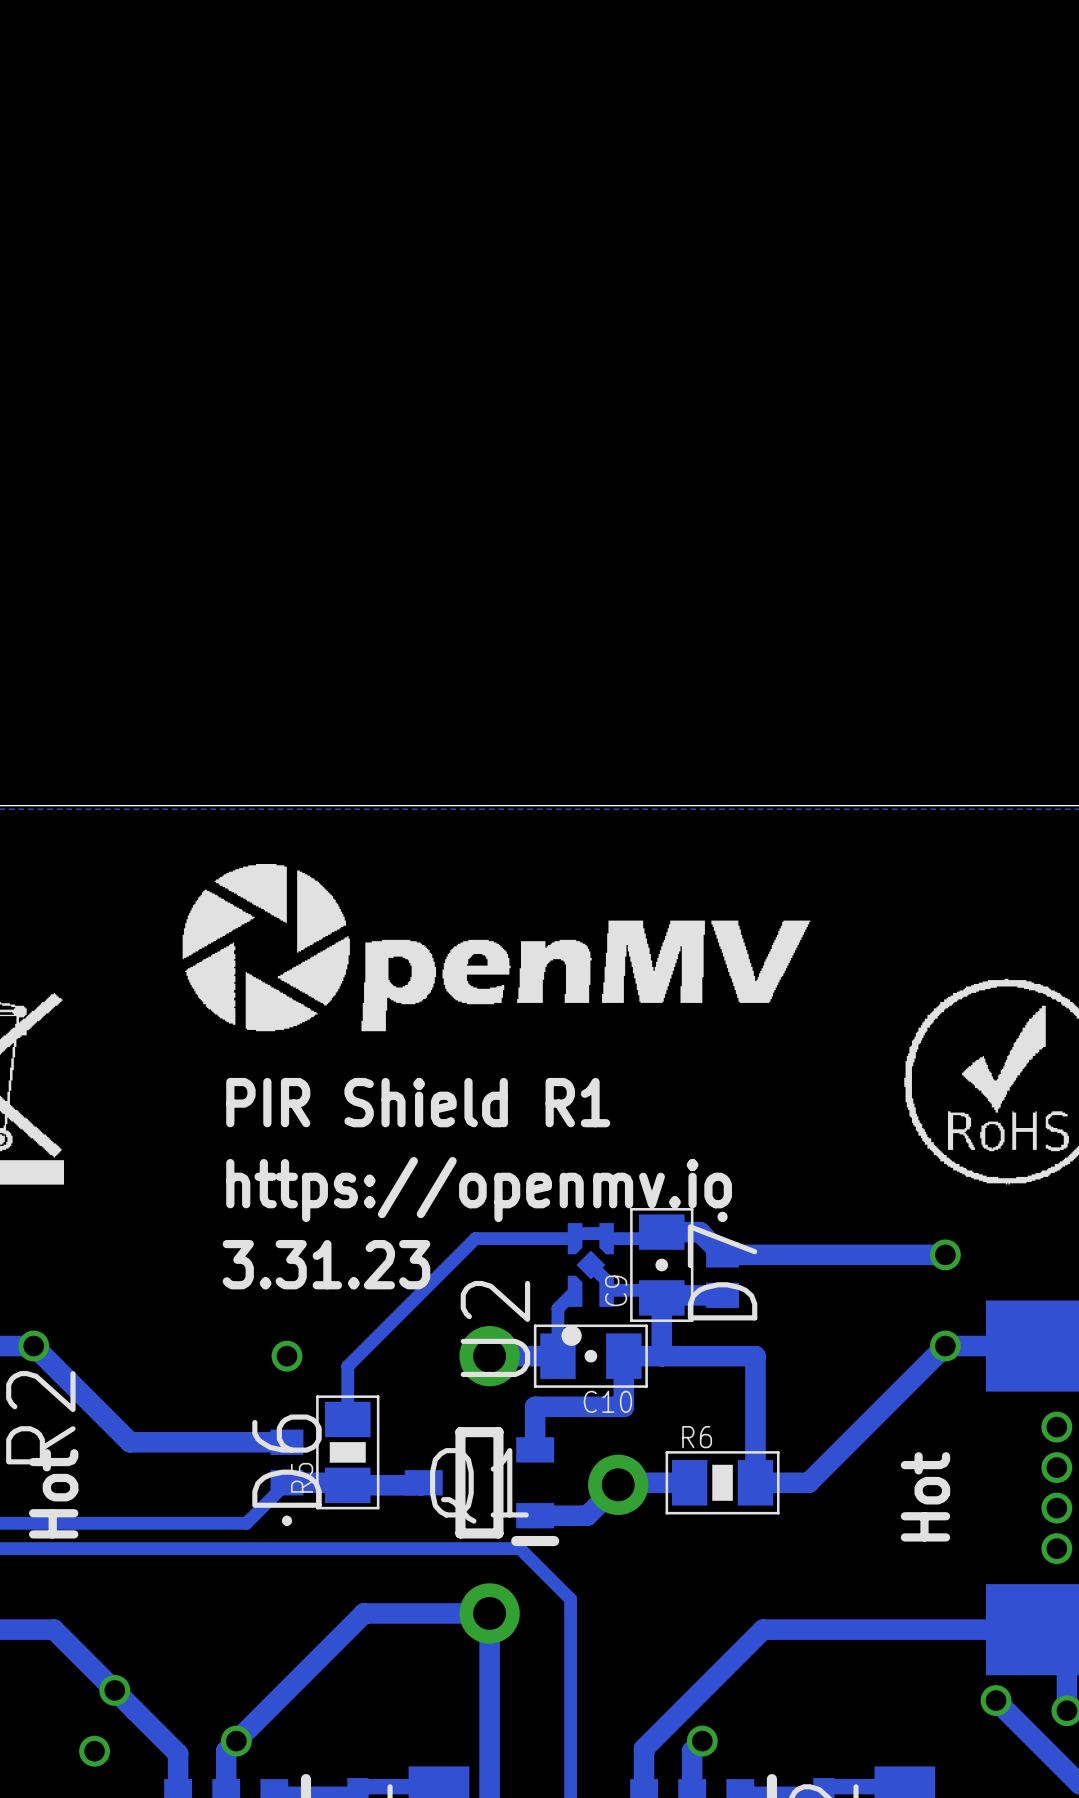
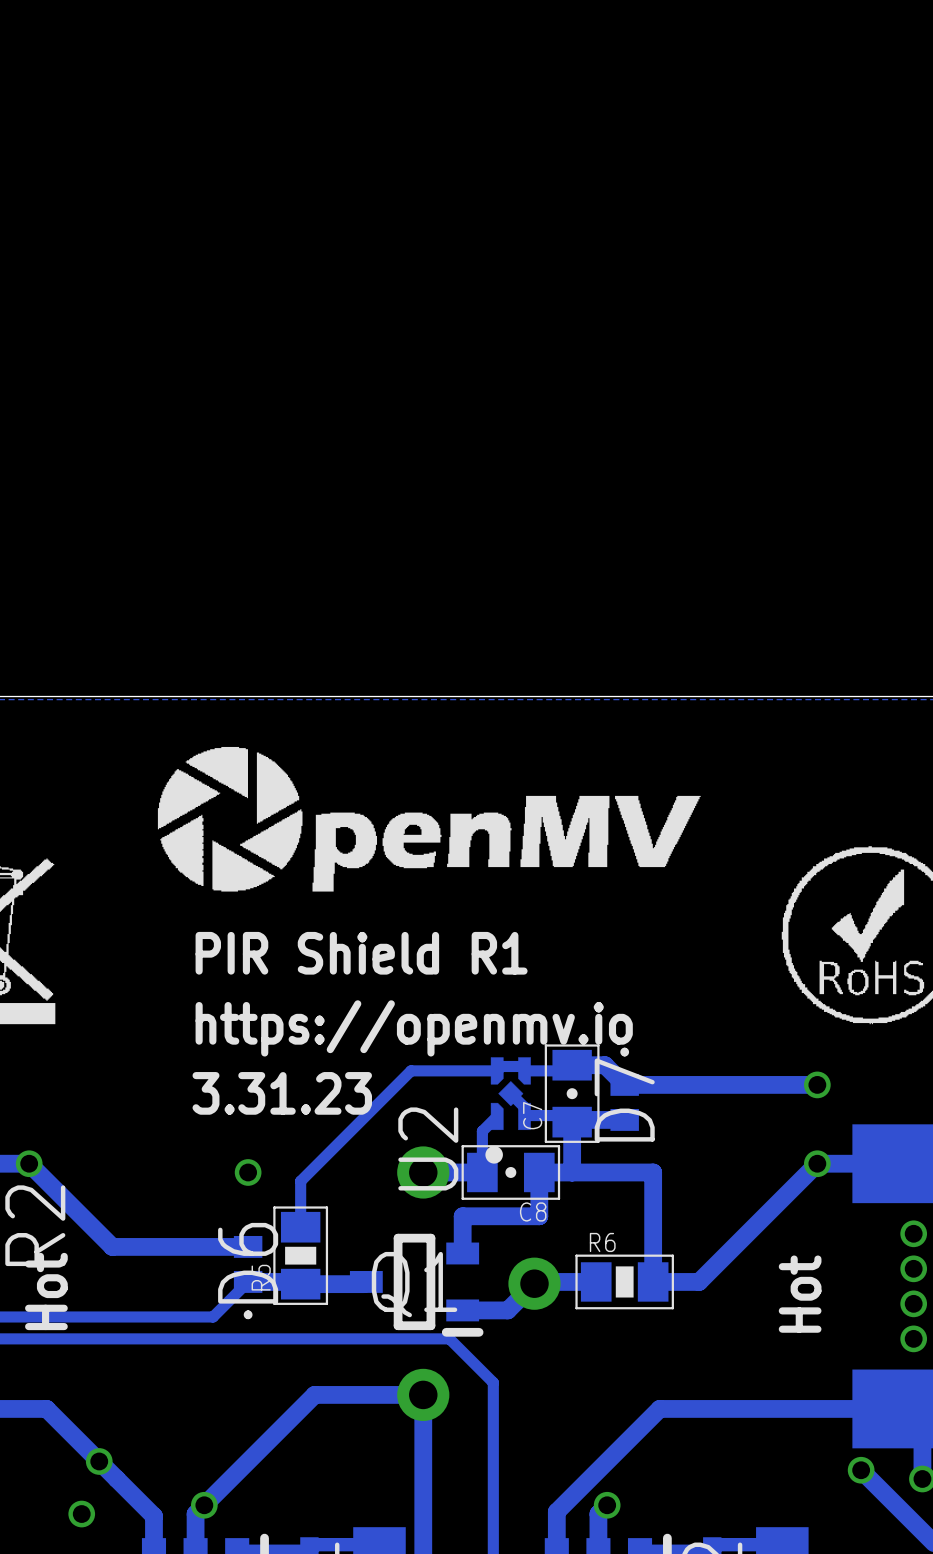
C9 name: C9 (616, 1290) -> C7 (532, 1115)
C10 name: C10 (607, 1401) -> C8 (533, 1211)

